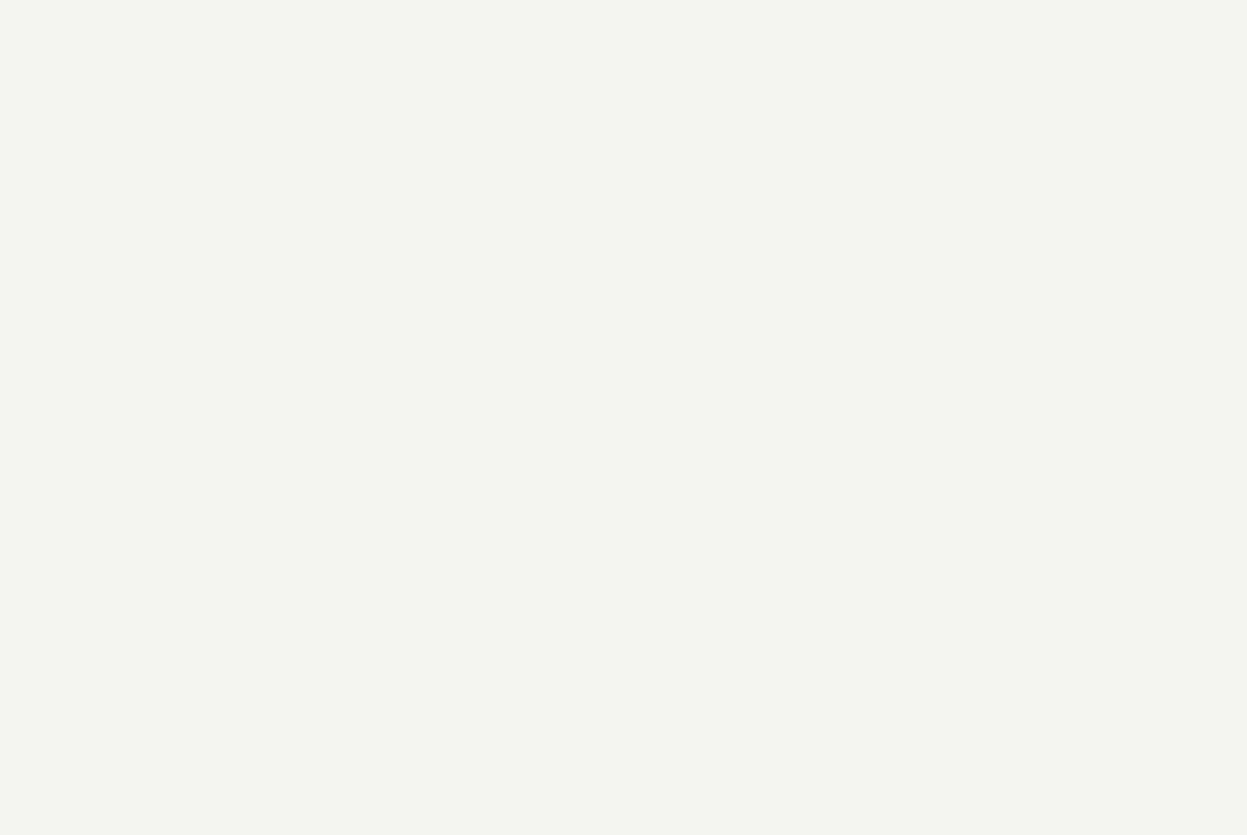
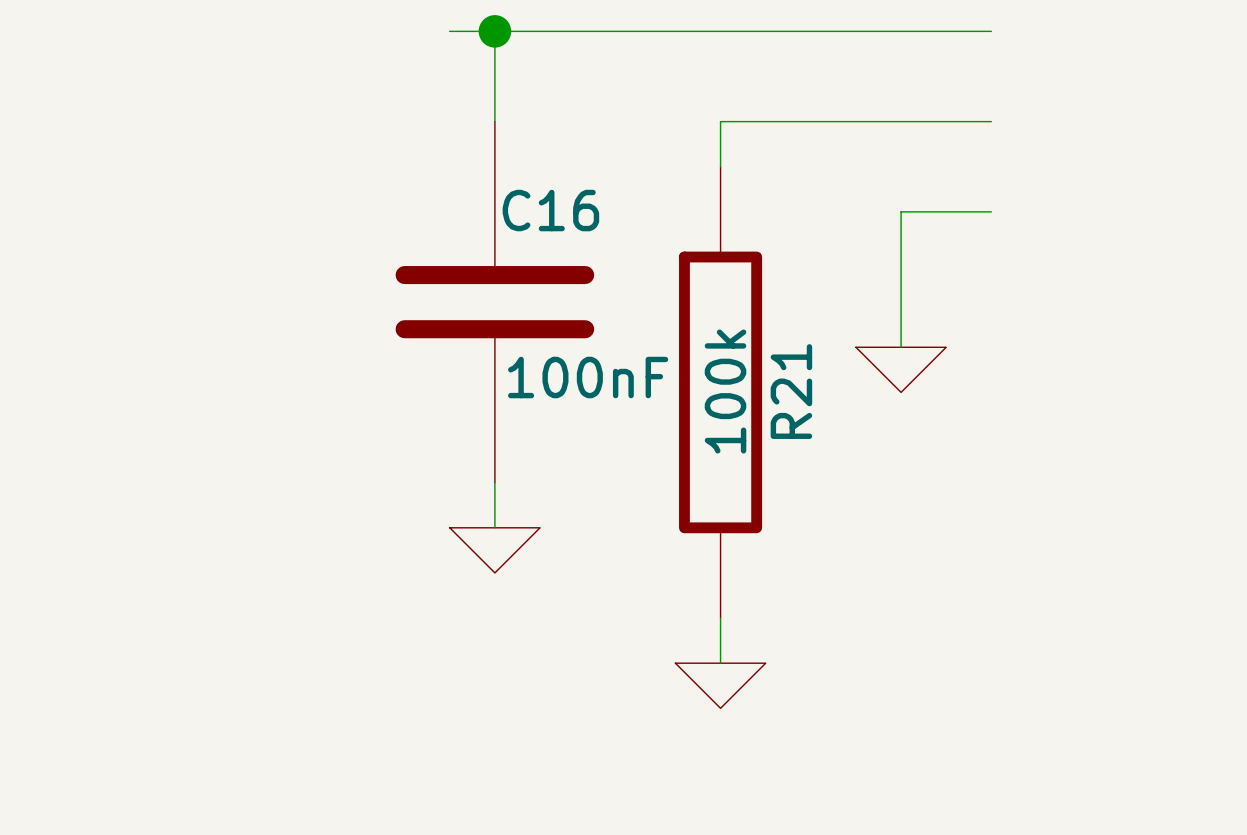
wire: none -> (449, 31) (991, 31)
wire: none -> (494, 31) (494, 121)
junction: none -> (494, 31)
wire: none -> (991, 121) (720, 121) (720, 166)
wire: none -> (991, 211) (901, 211) (901, 347)
C16: none -> 100nF (494, 302)
power symbol: none -> (901, 369)
R21: none -> 100k (720, 392)
wire: none -> (494, 482) (494, 527)
power symbol: none -> (494, 550)
wire: none -> (720, 618) (720, 663)
power symbol: none -> (720, 685)

